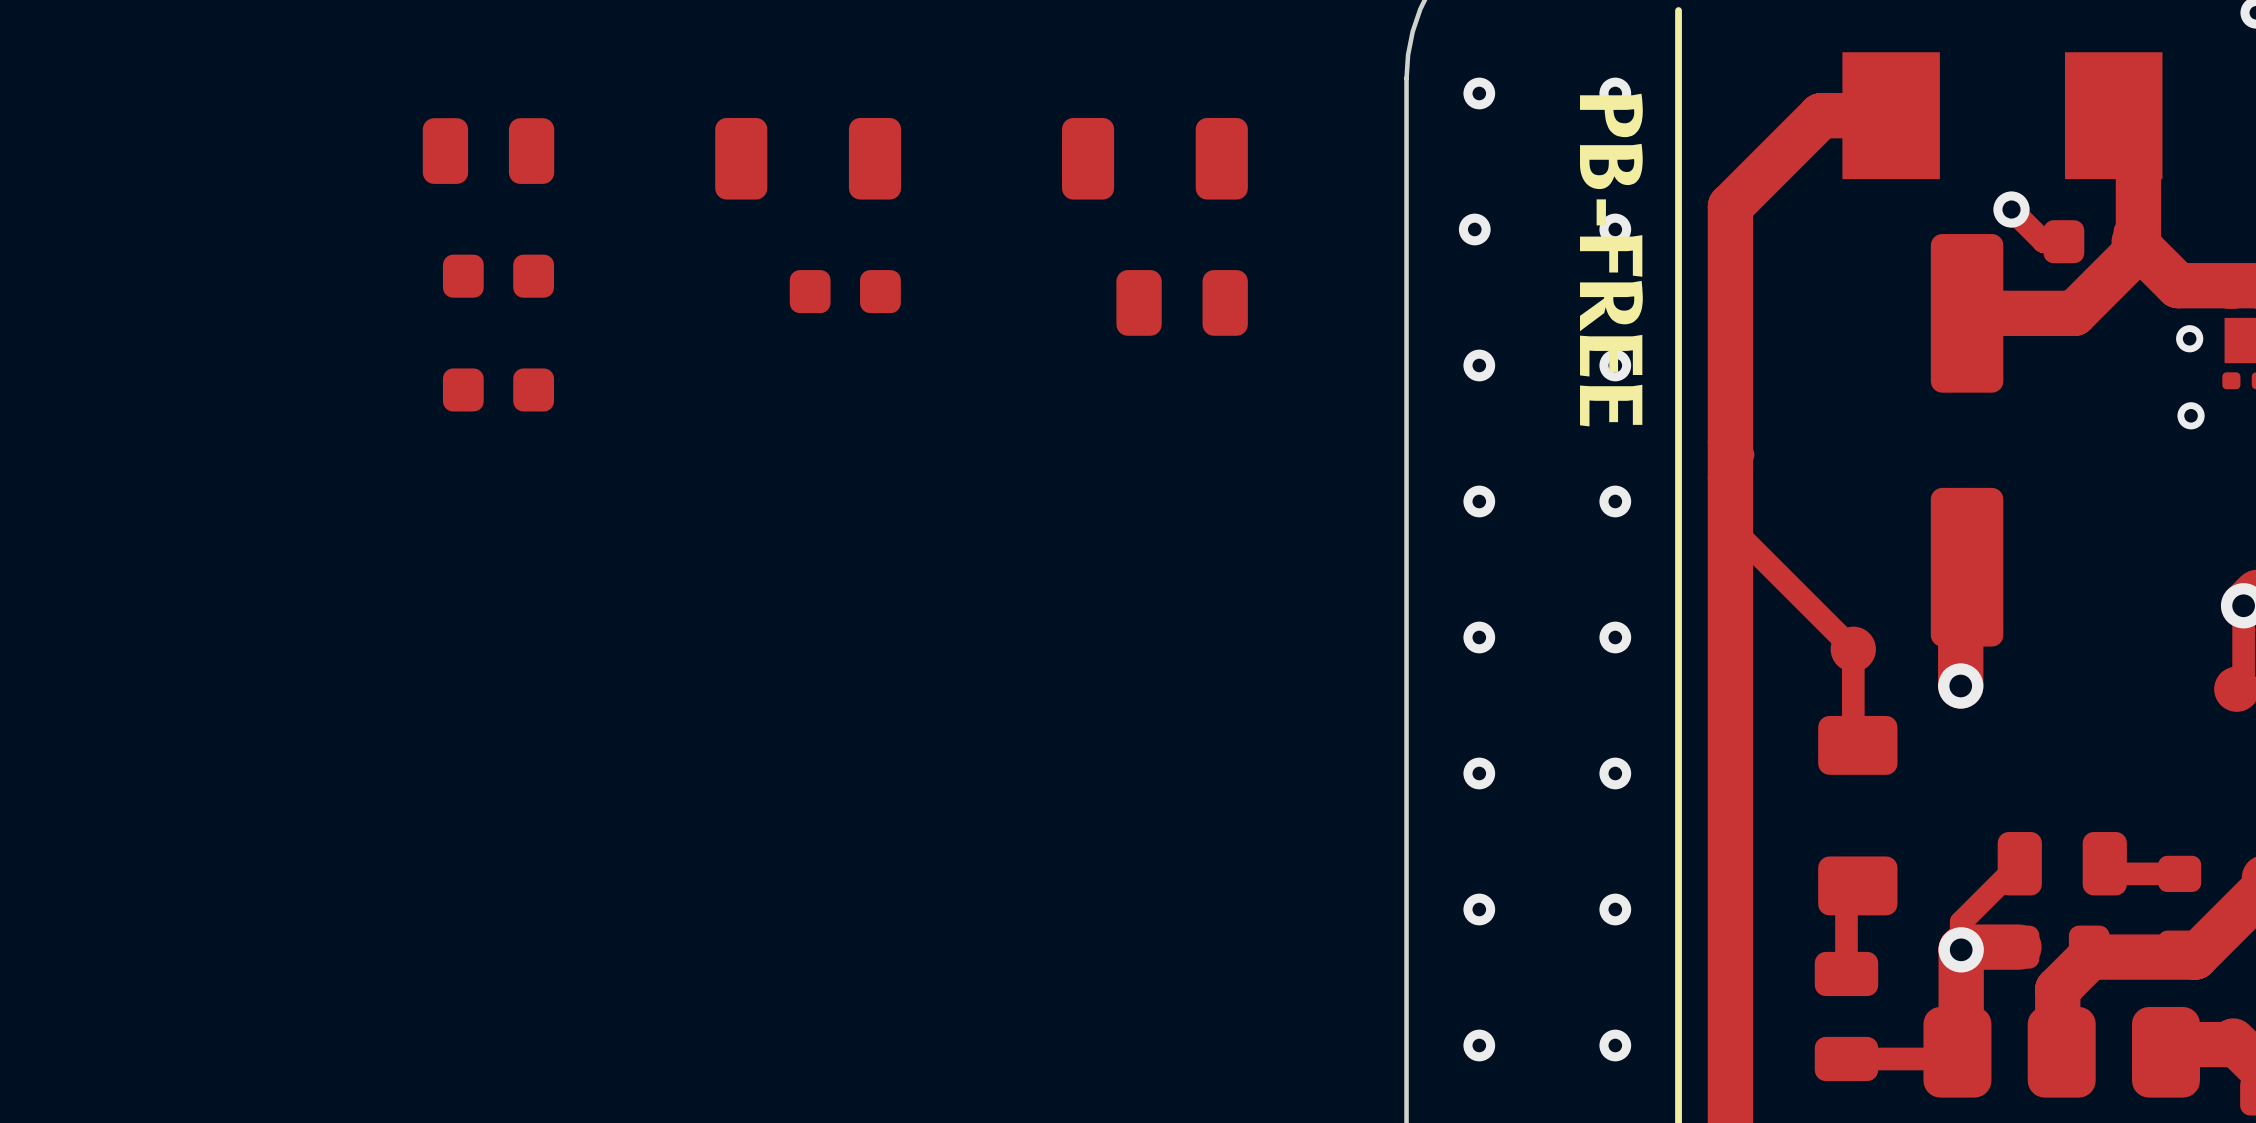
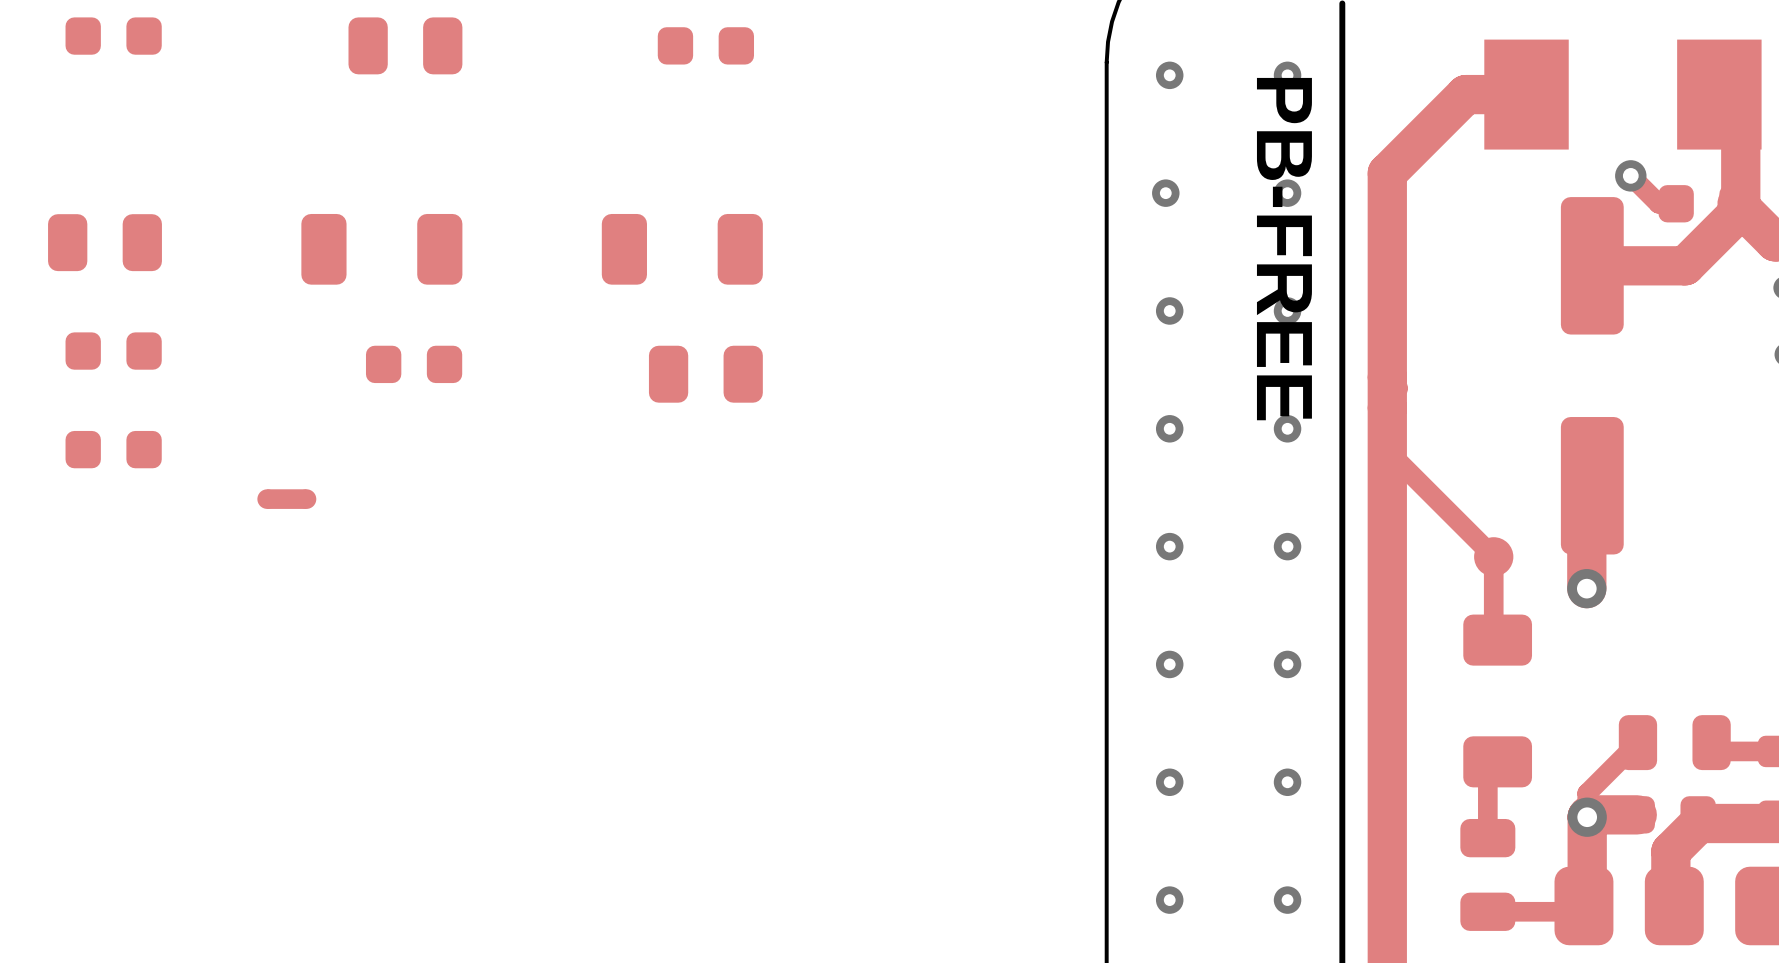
part: none -> (113, 36)
part: none -> (405, 45)
part: none -> (705, 45)
part: (488, 151) -> none
part: (808, 158) -> none
part: (1154, 158) -> none
part: (498, 276) -> none
part: none -> (105, 242)
part: (845, 291) -> none
part: none -> (381, 249)
part: none -> (682, 249)
part: (1182, 302) -> none
part: (498, 389) -> none
part: none -> (113, 351)
part: none -> (414, 364)
part: none -> (705, 374)
part: none -> (113, 449)
part: none -> (286, 499)

